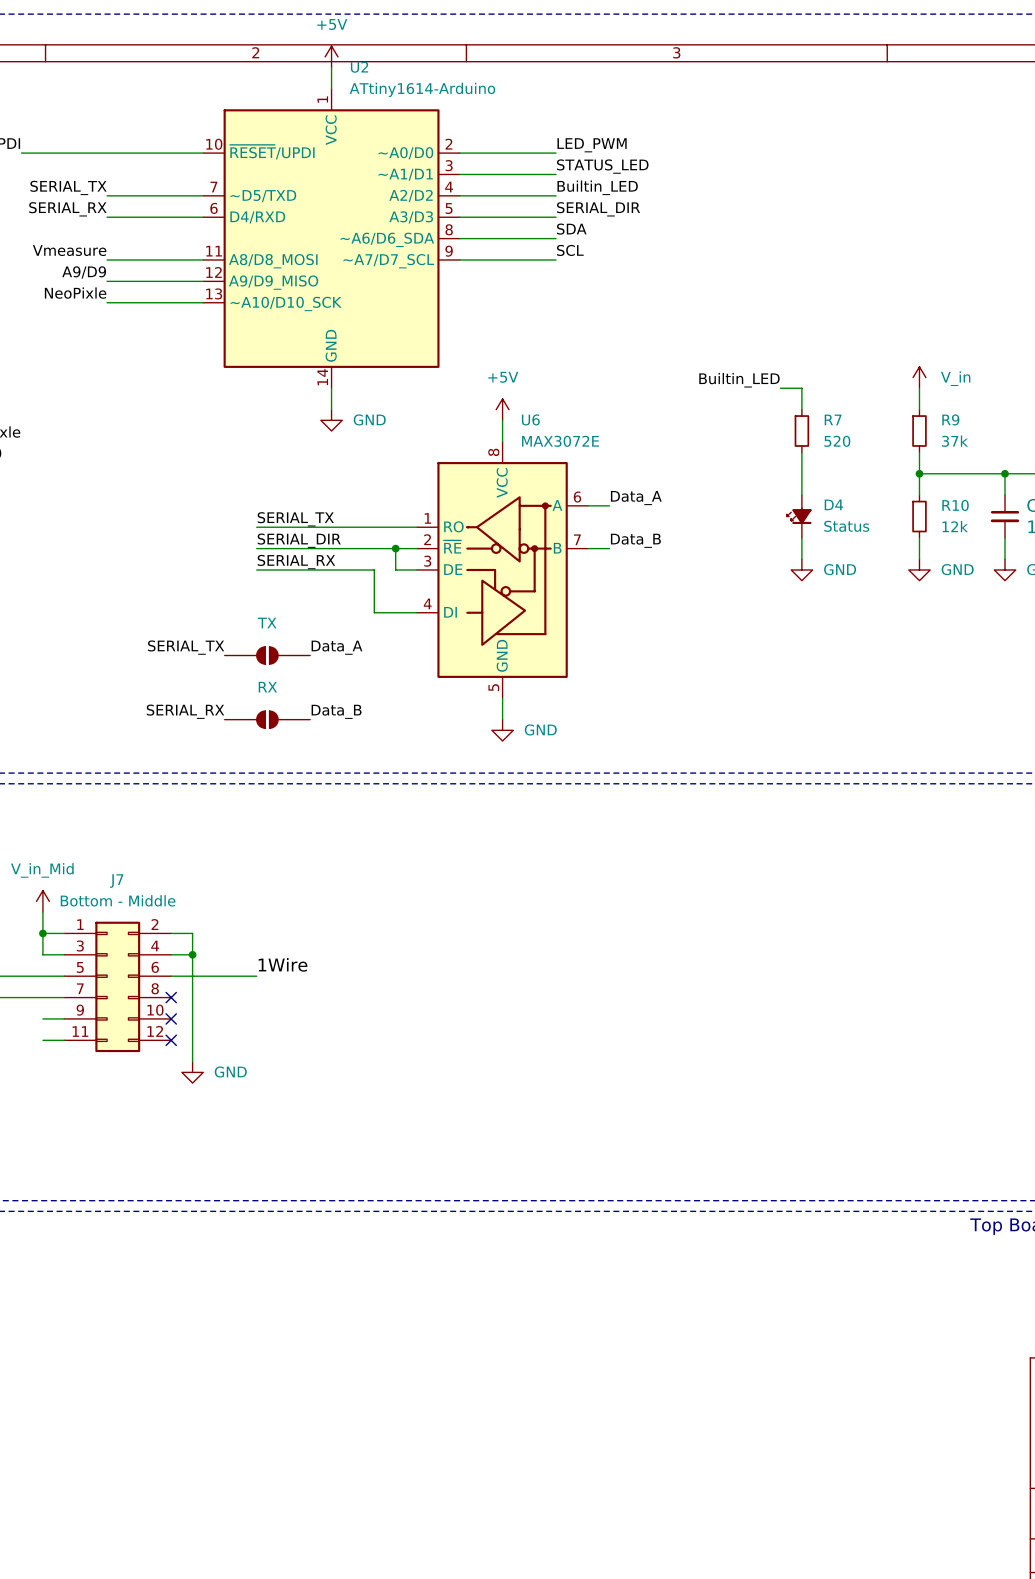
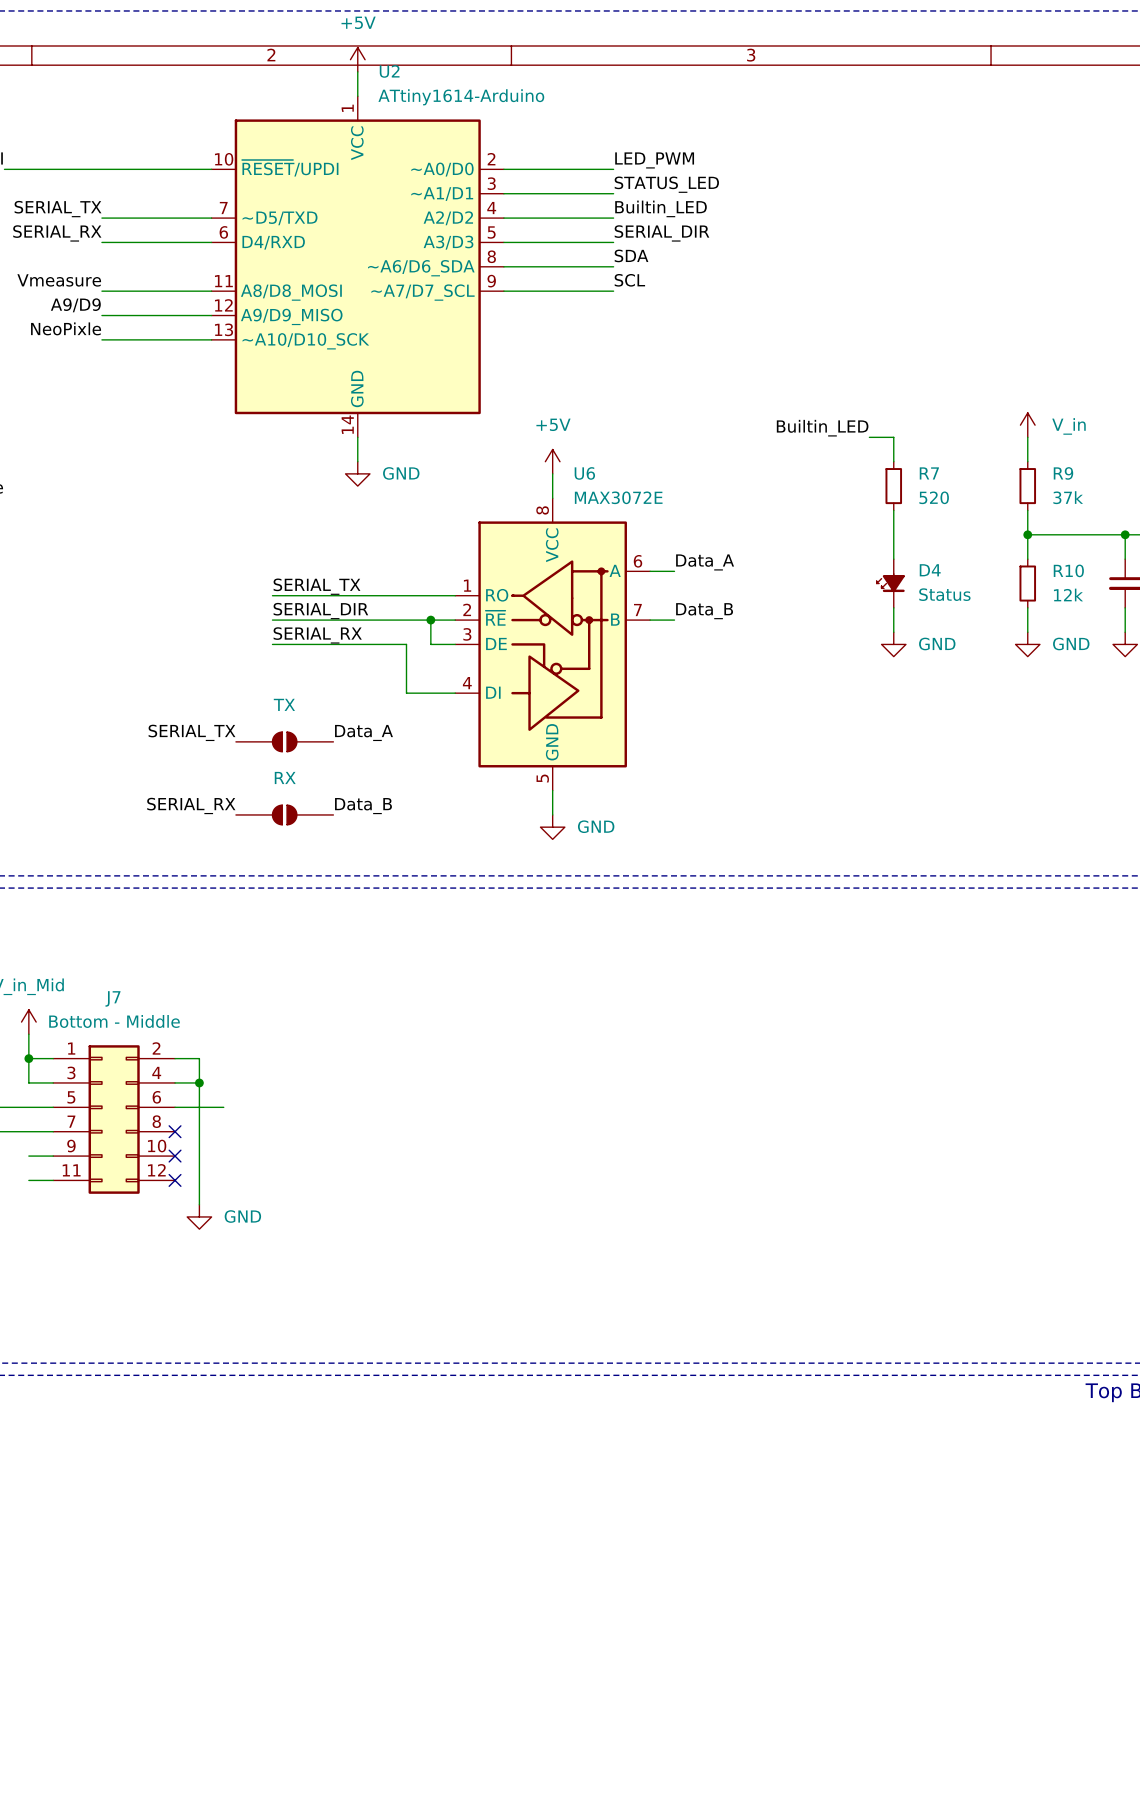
label: 1Wire (282, 964) -> none
wire: (213, 976) (256, 976) -> none

